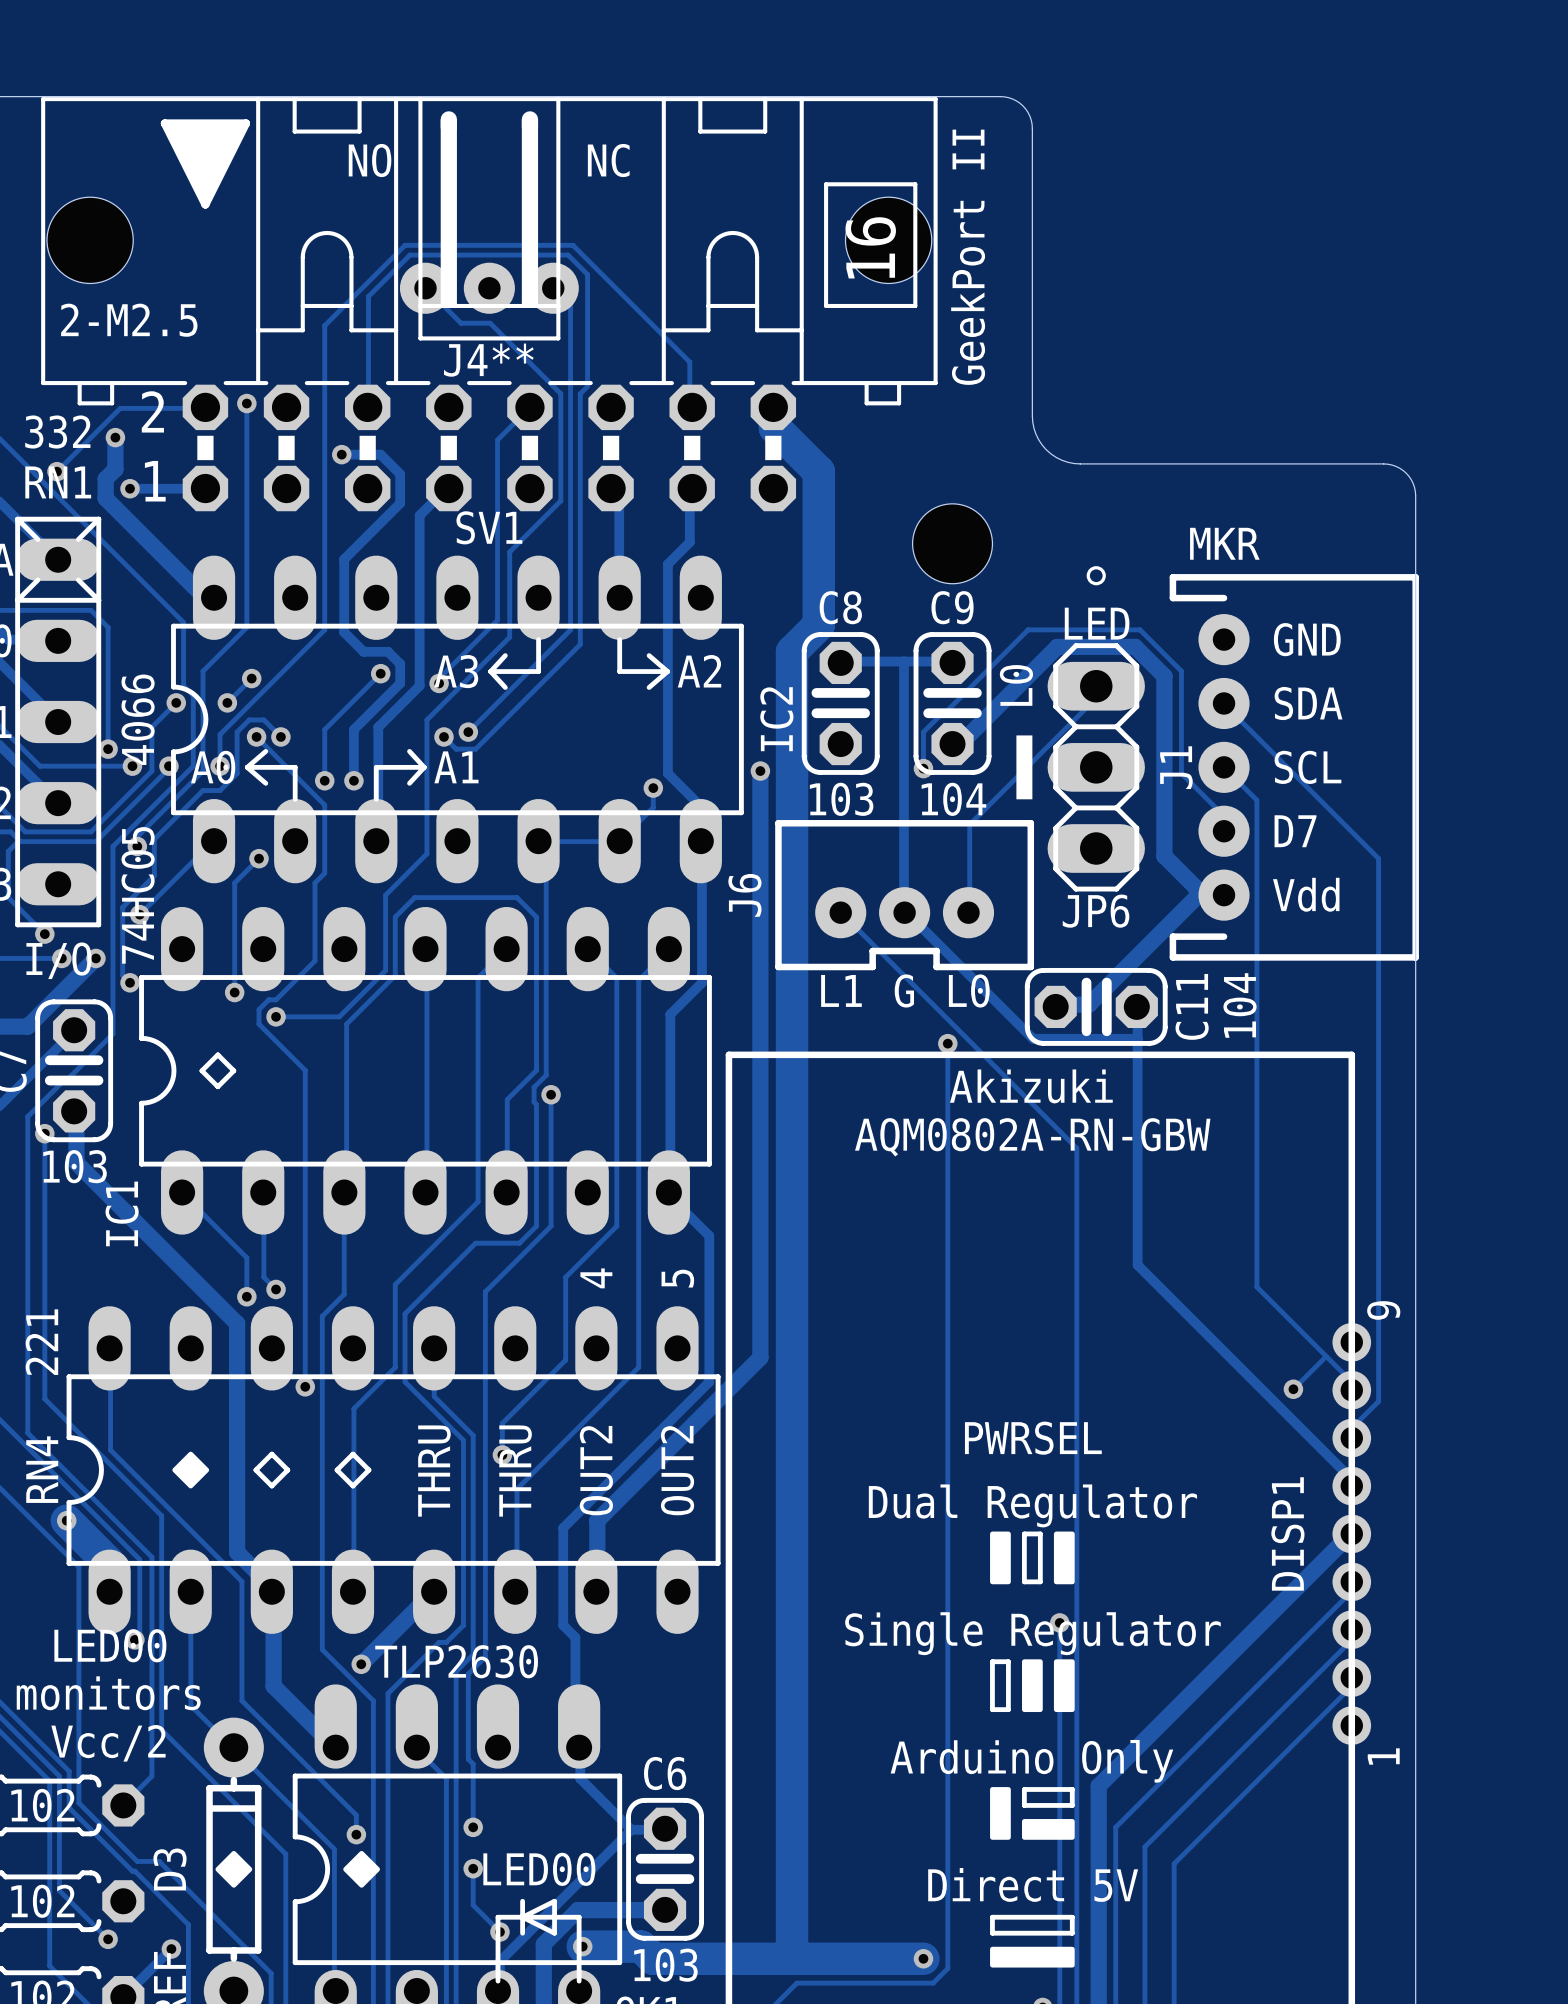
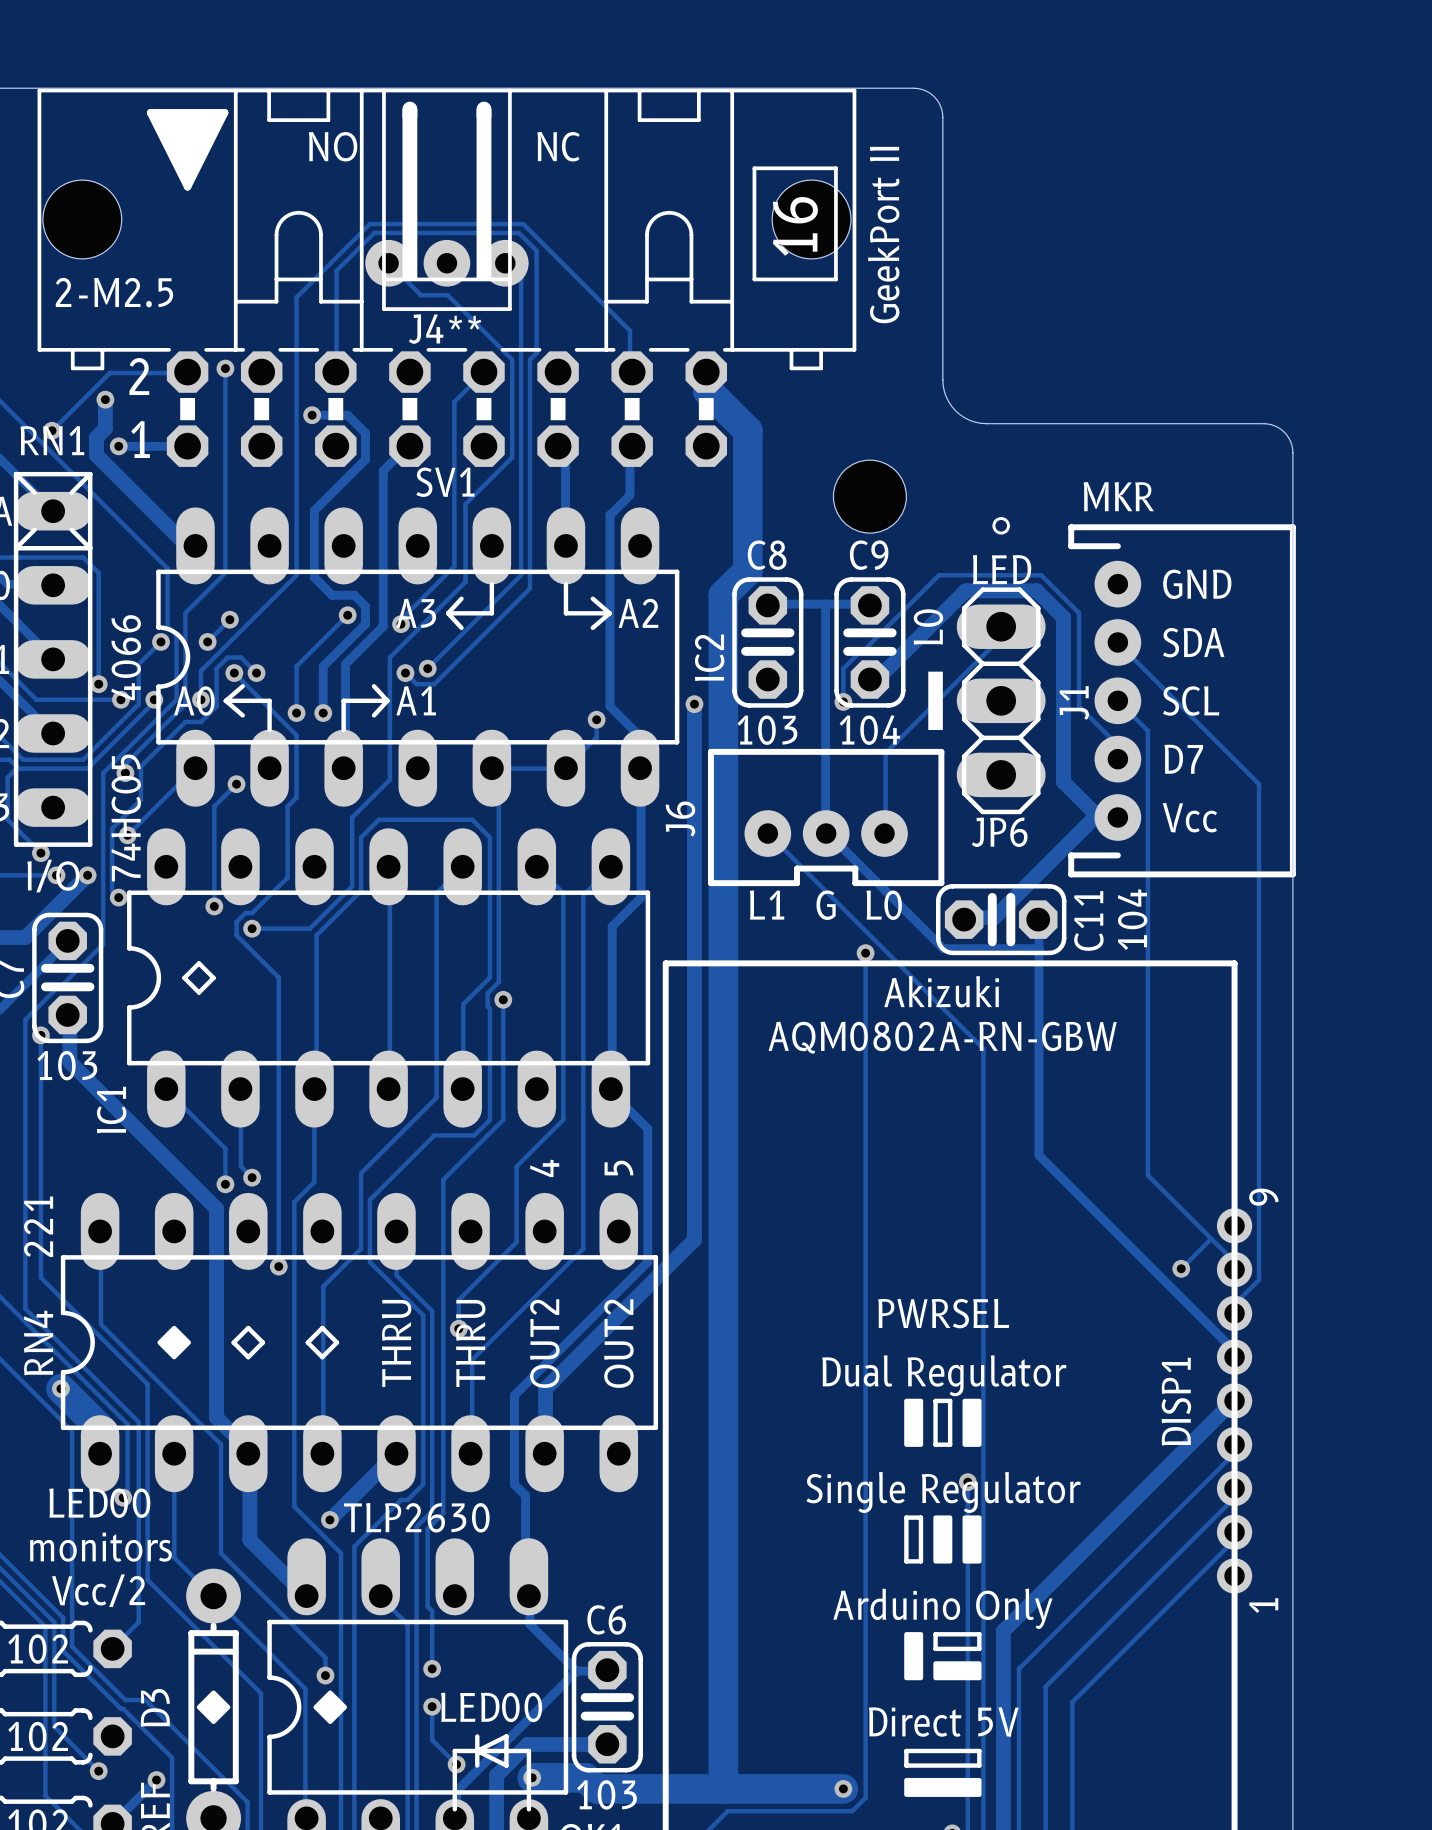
text: 332 (57, 432) -> none
text: Vdd (1306, 894) -> Vcc (1189, 817)

